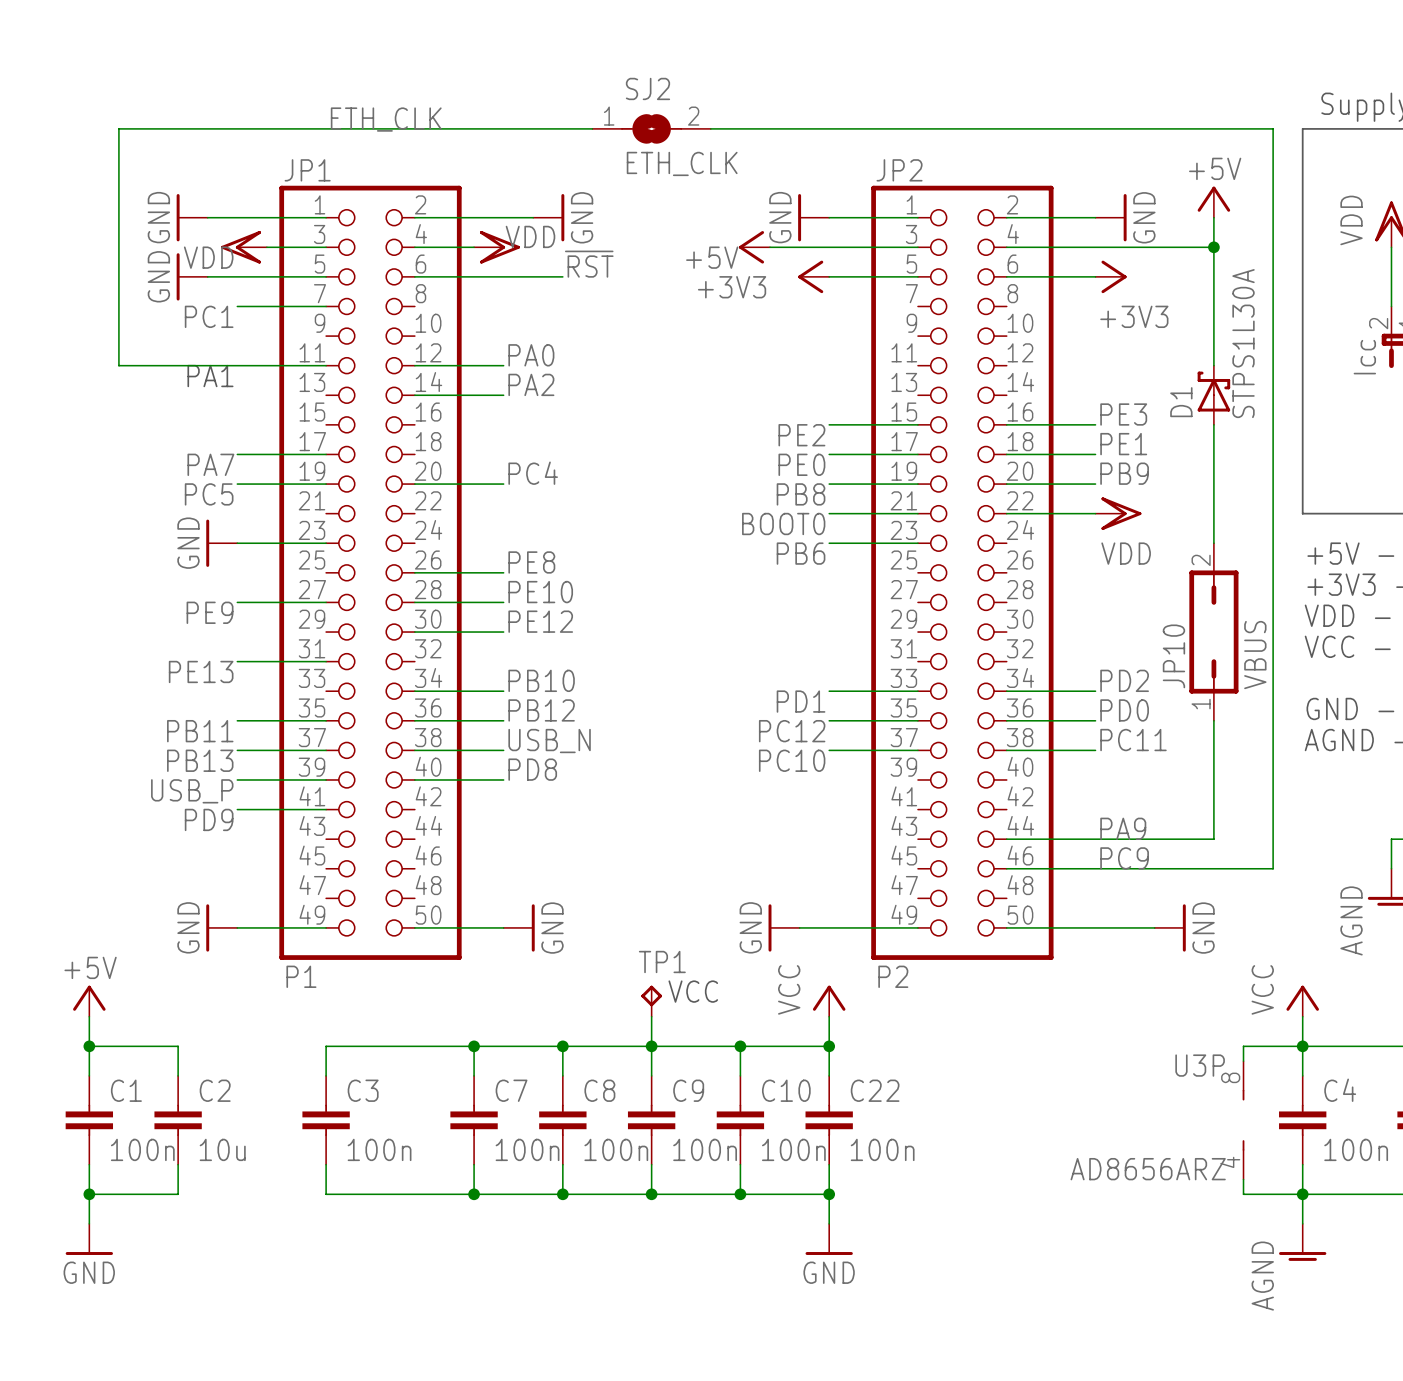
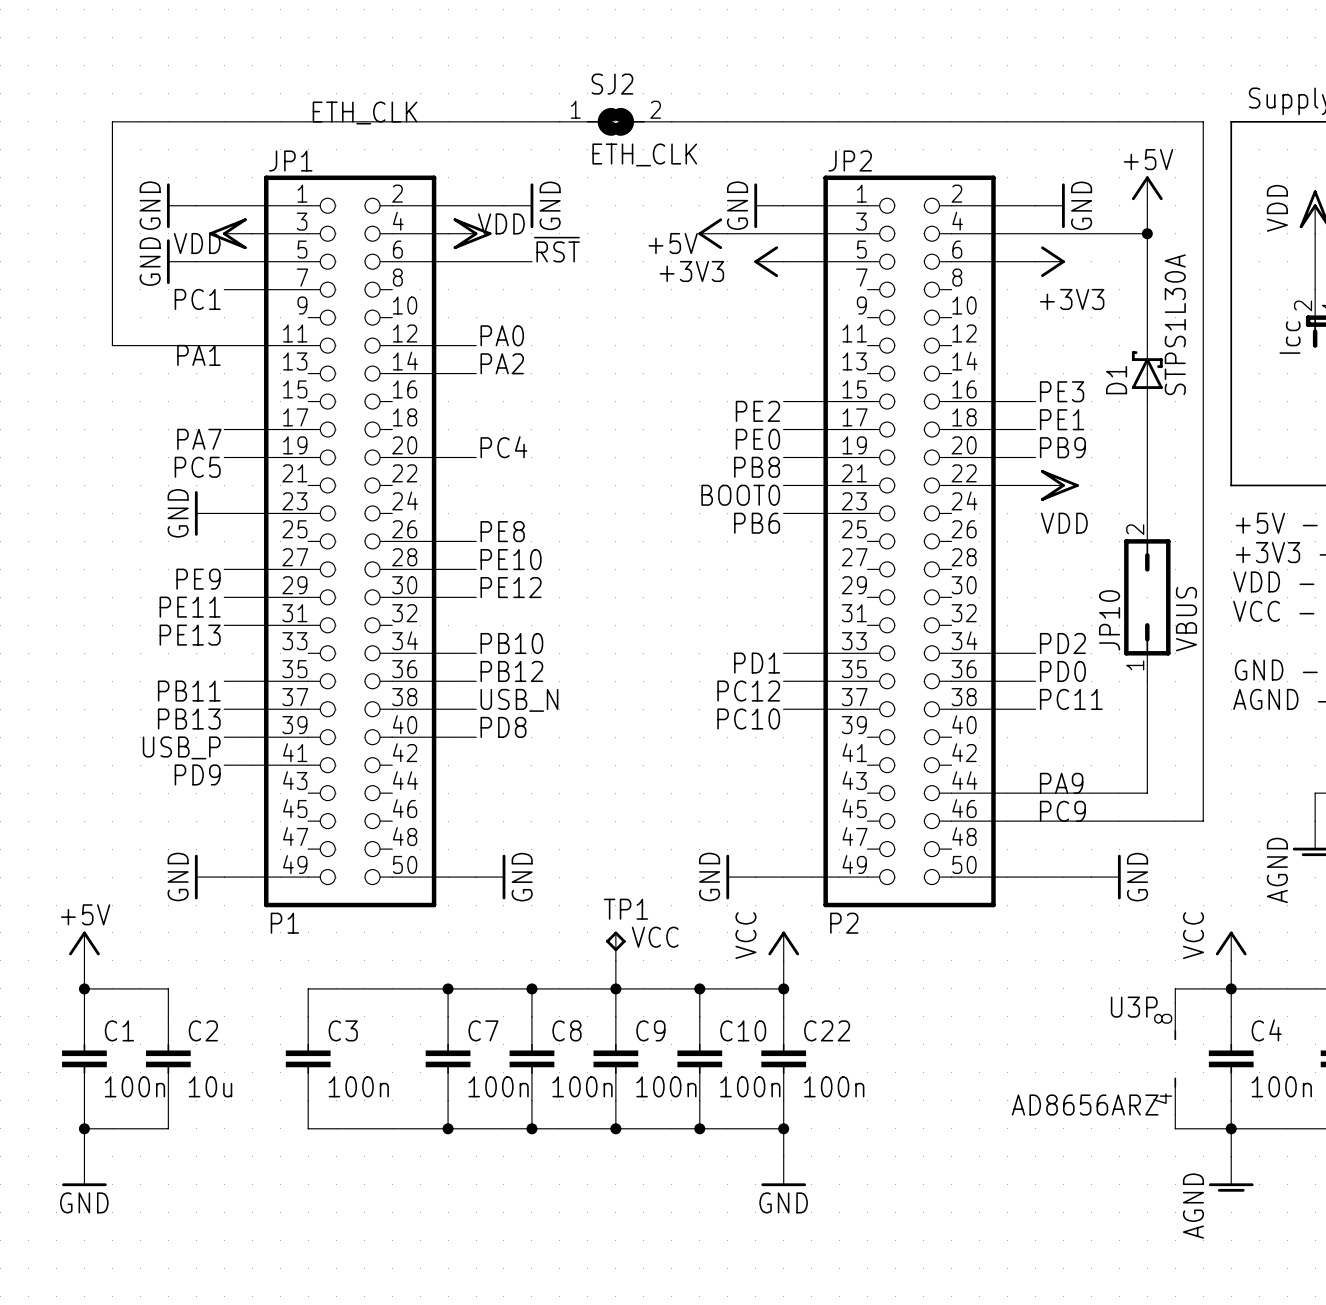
wire: none -> (224, 597) (308, 597)
label: none -> PE11 (190, 607)

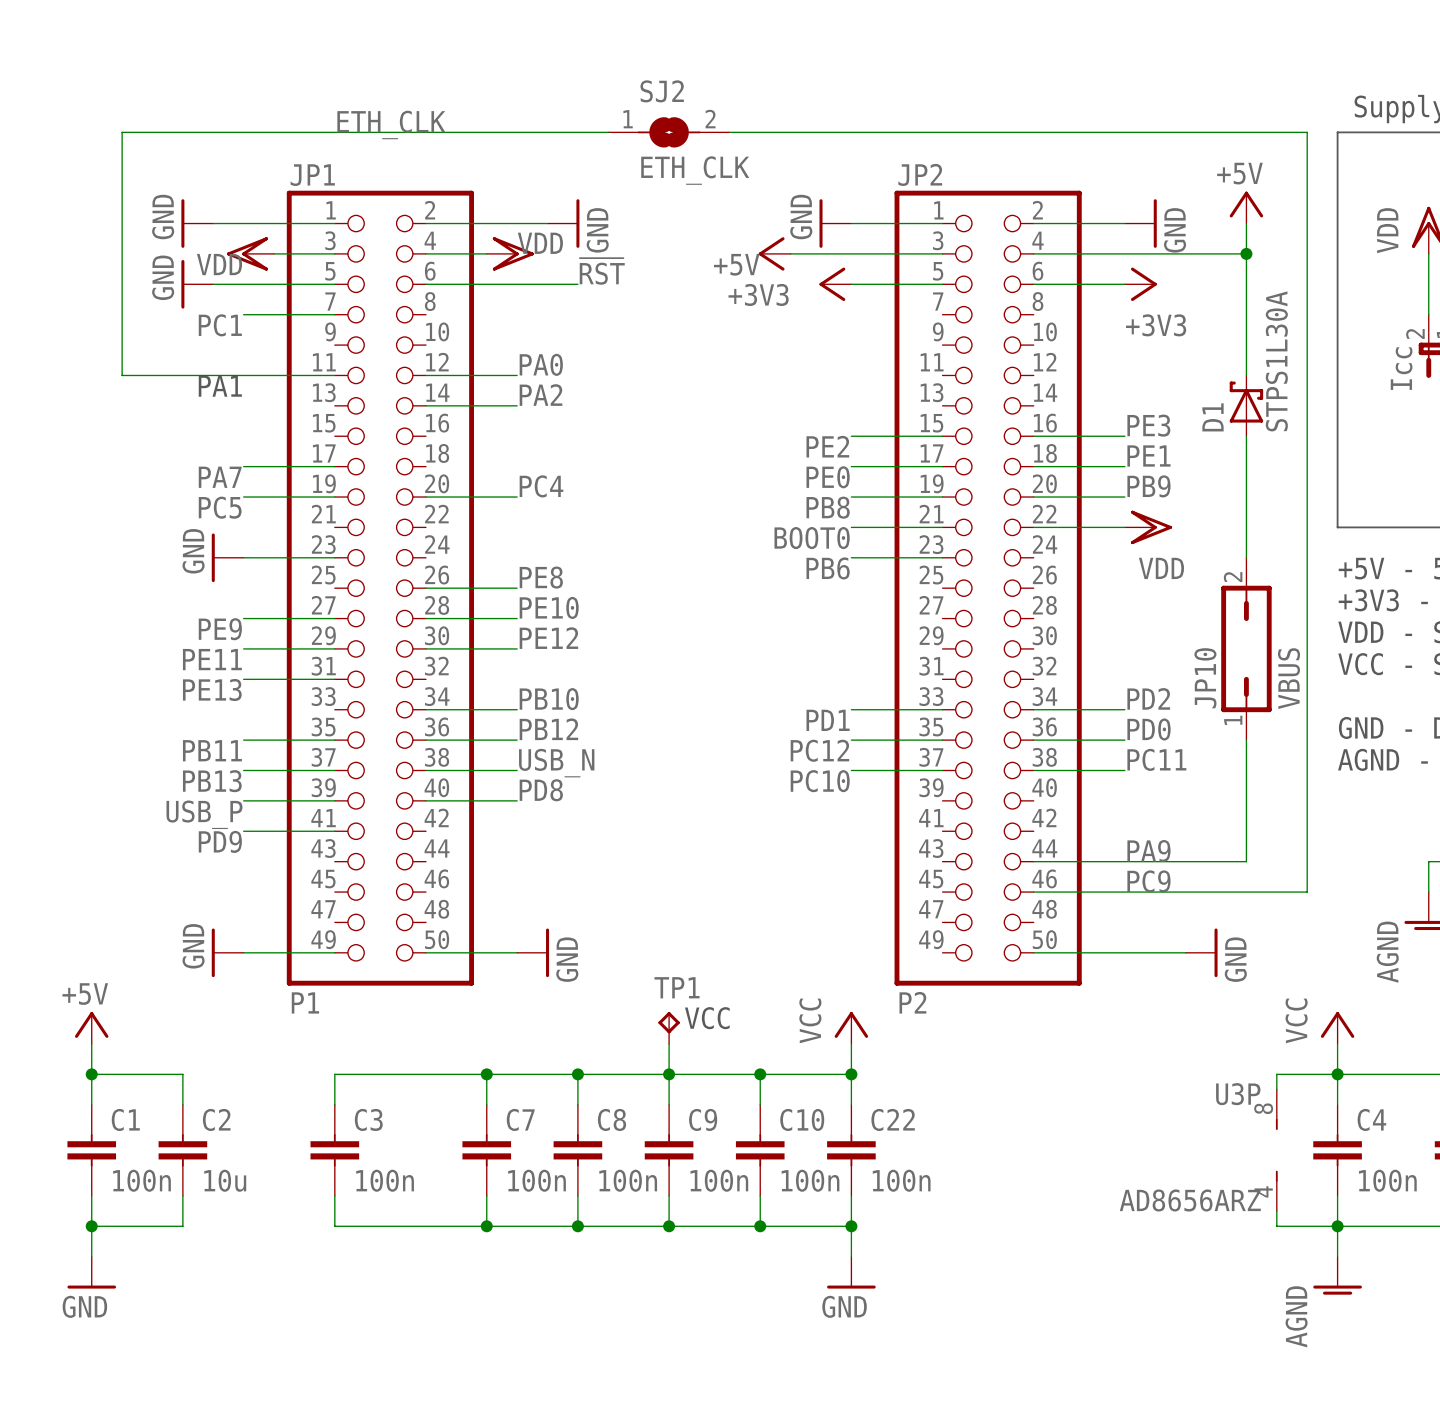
power symbol: GND (741, 877) -> none
wire: (755, 877) (867, 877) -> none

